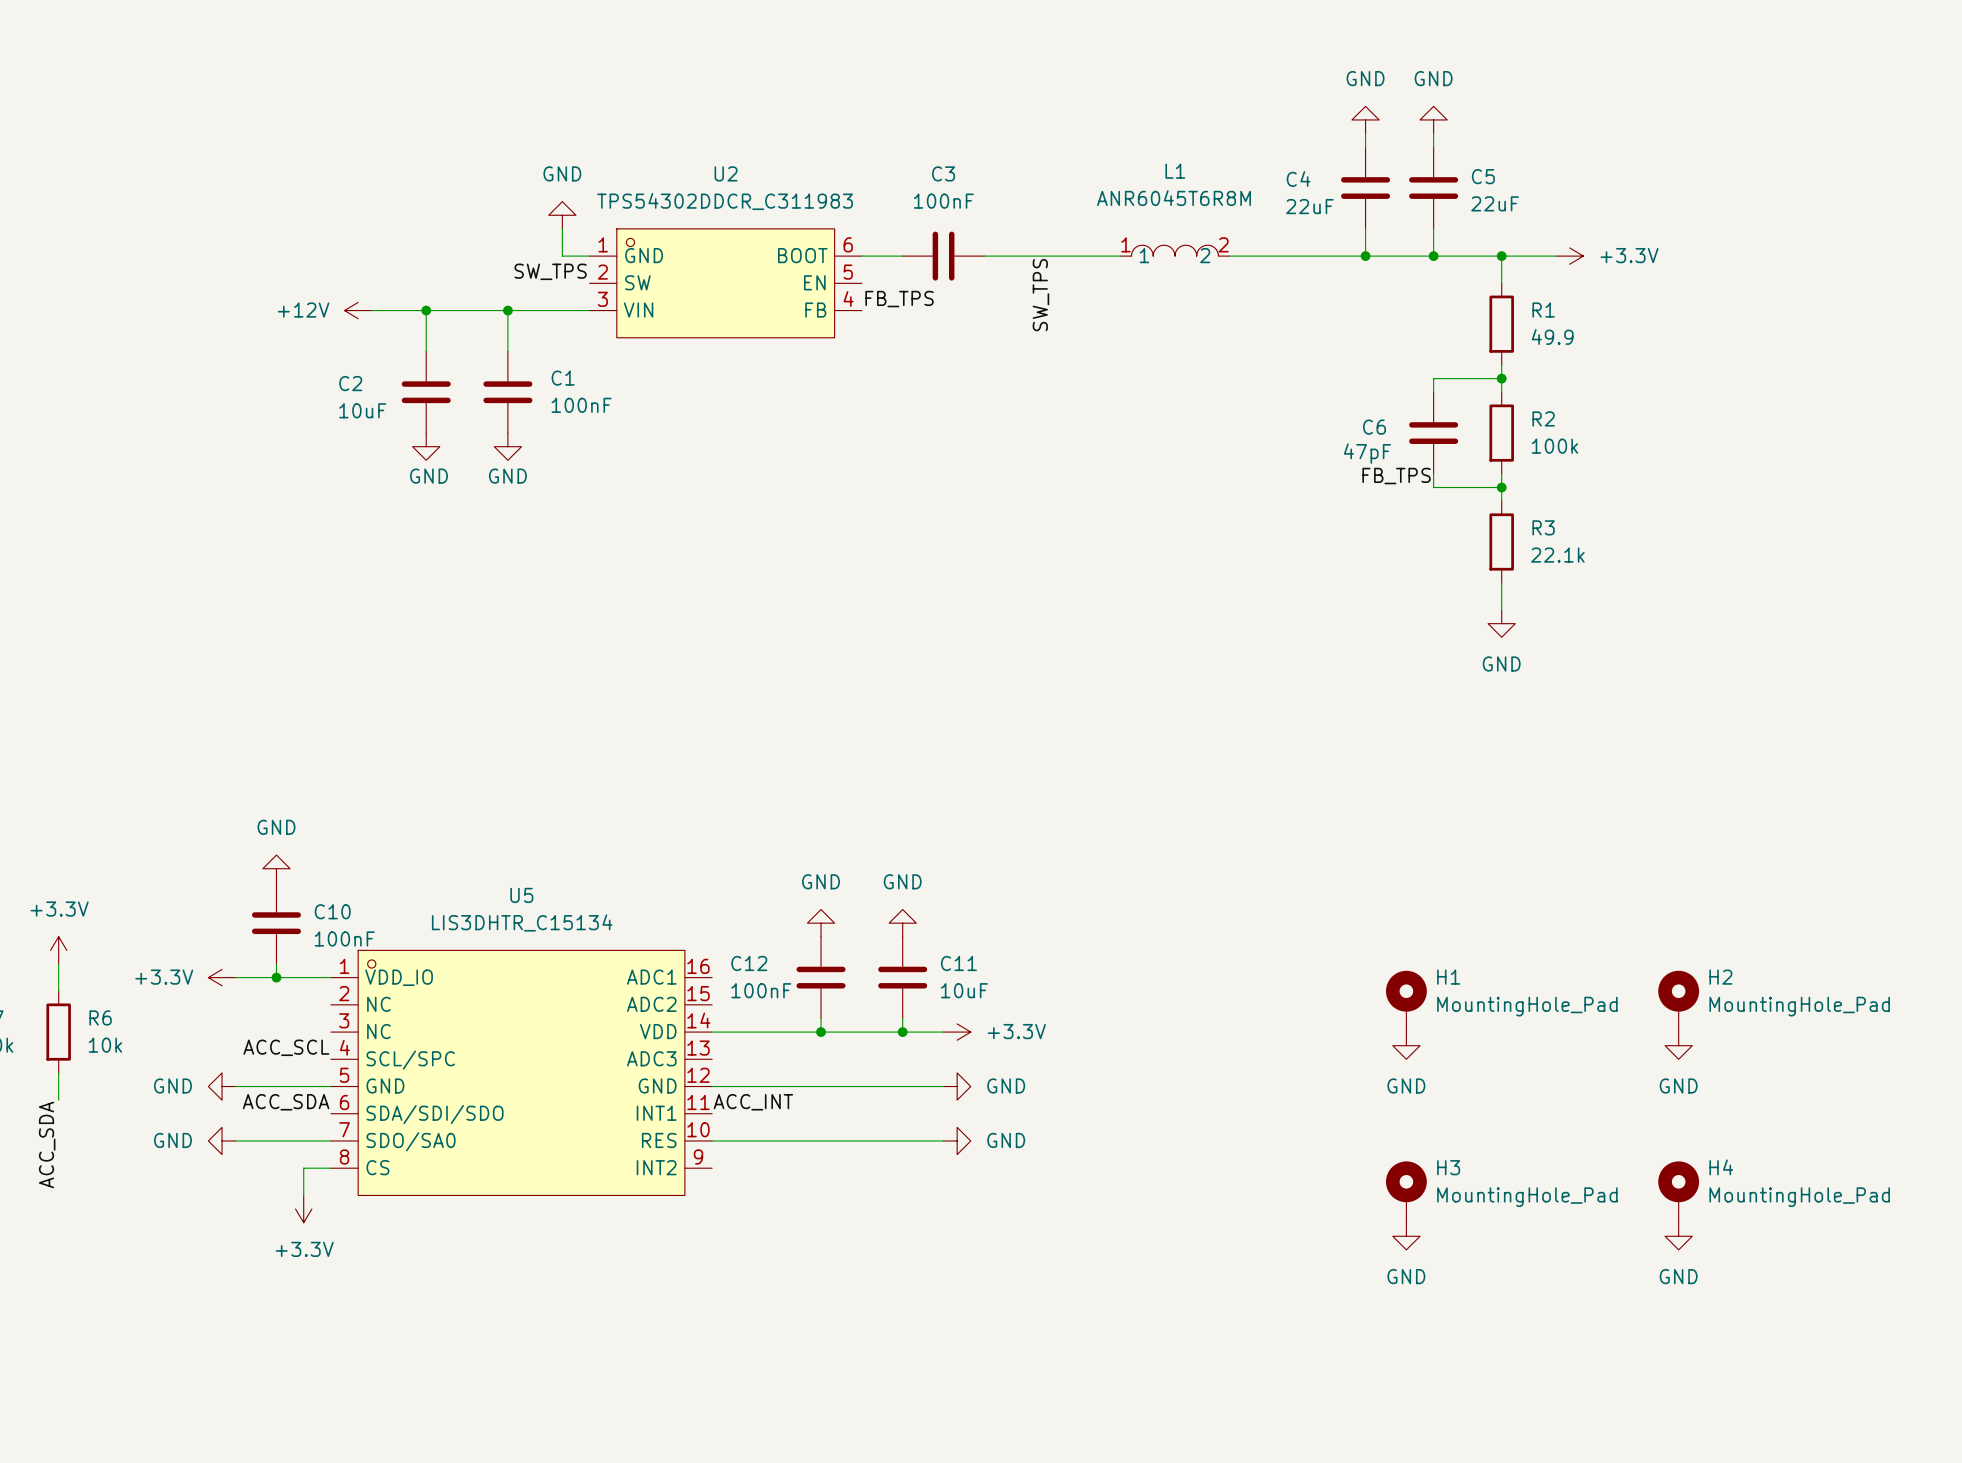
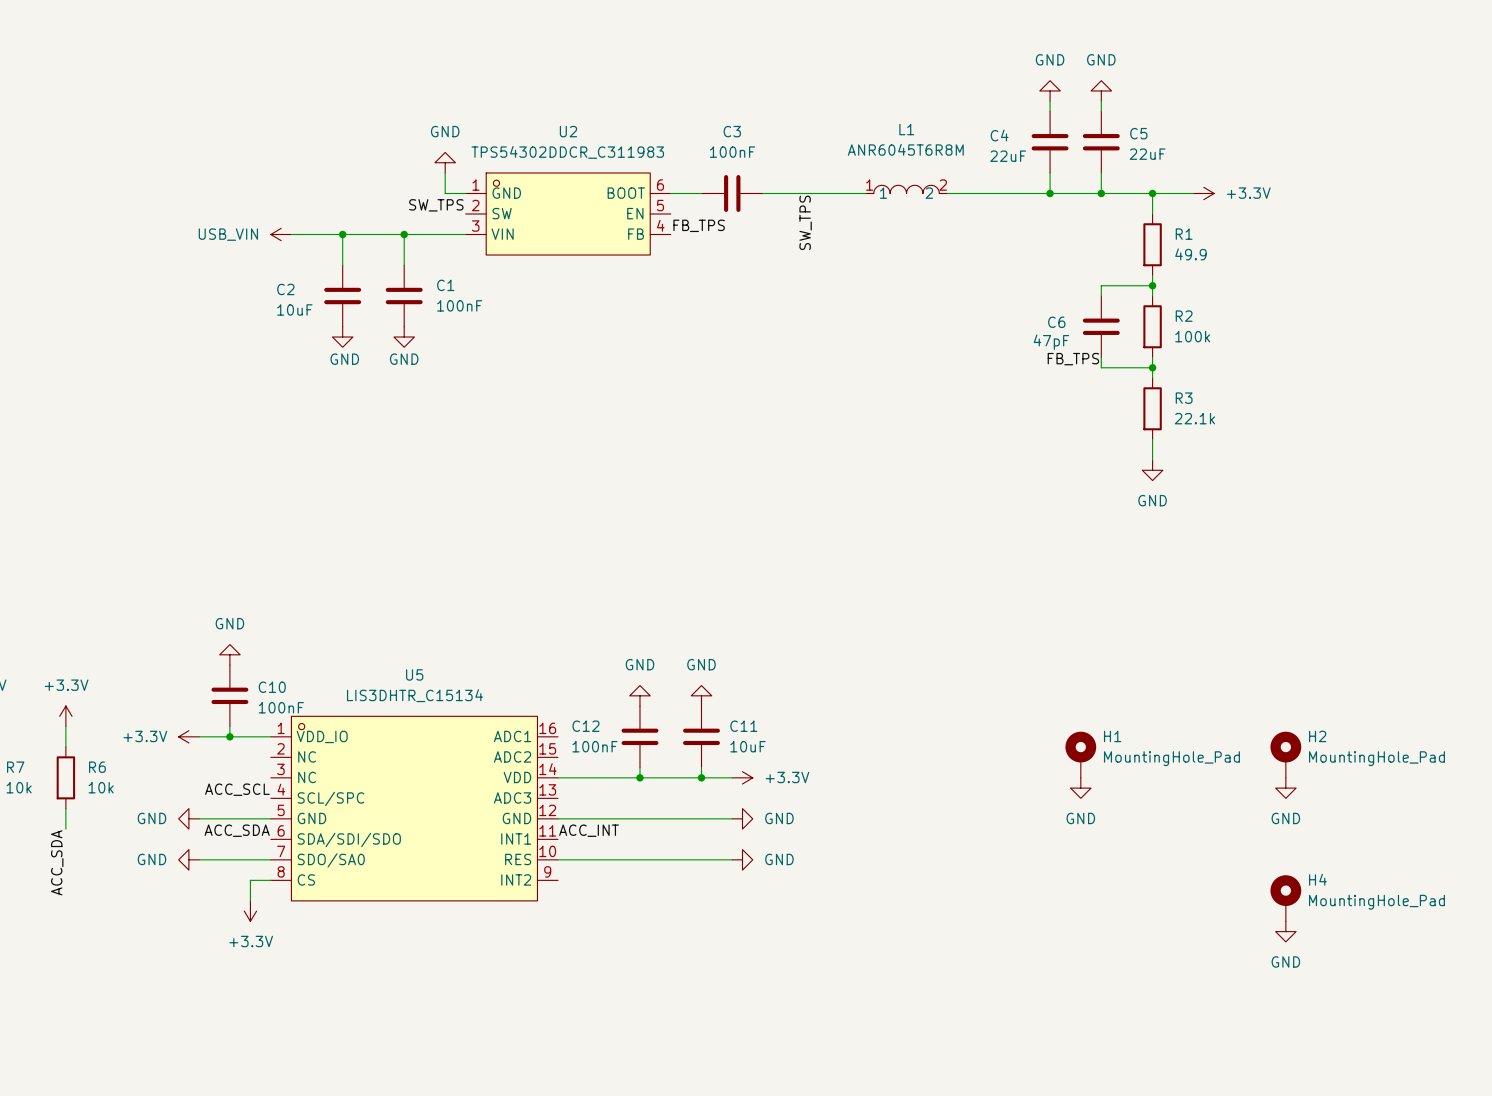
power symbol: none -> USB_VIN (281, 234)
power symbol: +12V (358, 310) -> none
H3: MountingHole_Pad (1406, 1192) -> none
power symbol: GND (1406, 1236) -> none

